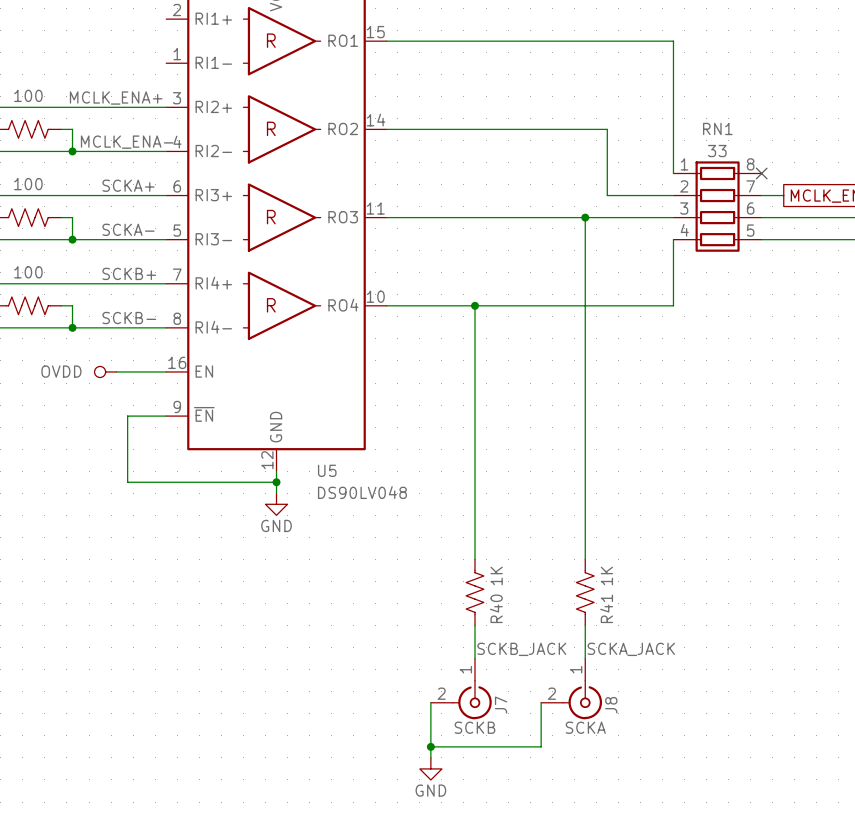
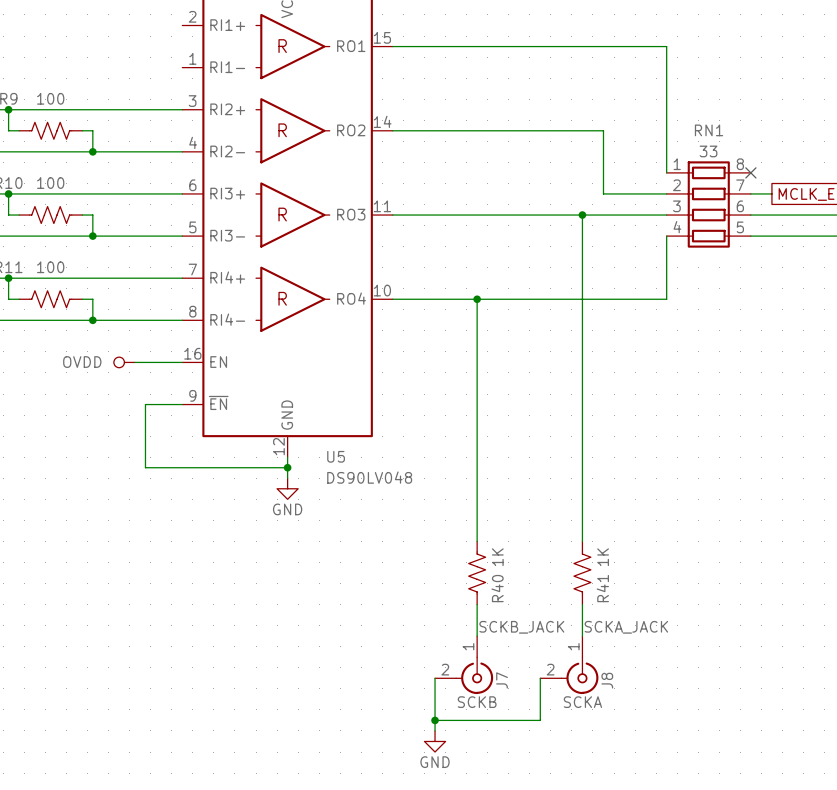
label: MCLK_ENA+ (116, 98) -> none
label: MCLK_ENA- (127, 142) -> none
label: SCKA+ (128, 185) -> none
label: SCKA- (128, 229) -> none
label: SCKB+ (129, 273) -> none
label: SCKB- (129, 318) -> none

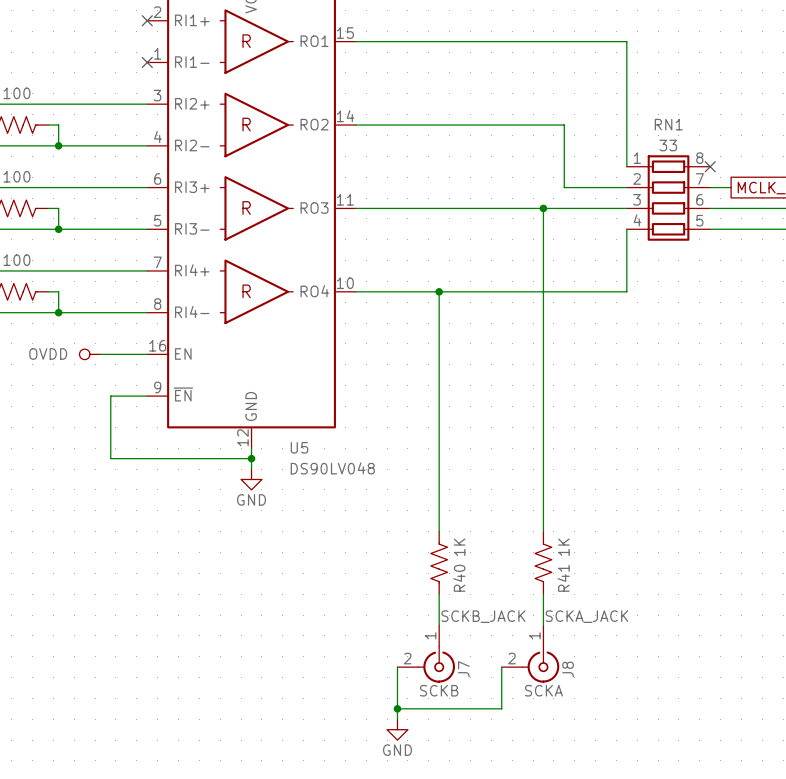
no-connect mark: none -> (147, 20)
no-connect mark: none -> (147, 62)

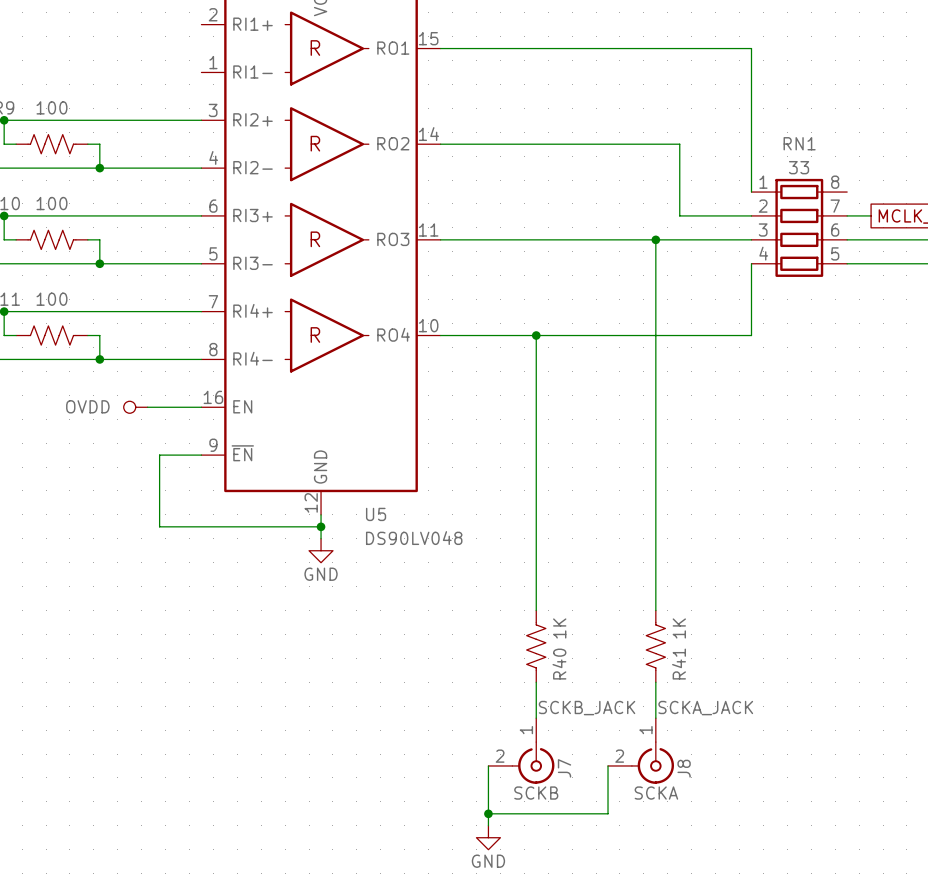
no-connect mark: (147, 20) -> none
no-connect mark: (147, 62) -> none
no-connect mark: (710, 166) -> none

